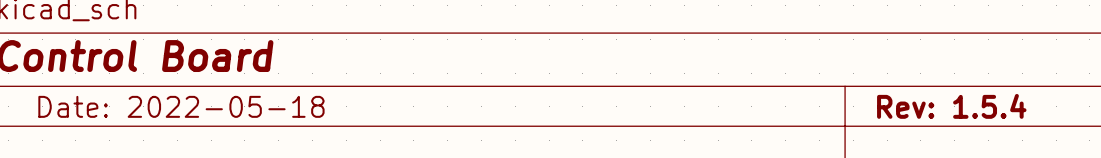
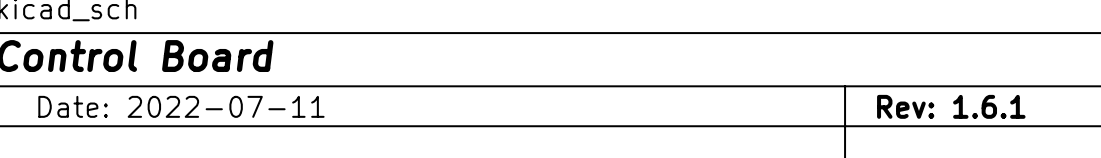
title block: Date: 2022-05-18 (181, 106) -> Date: 2022-07-11 (181, 106)
title block: Rev: 1.5.4 (951, 106) -> Rev: 1.6.1 (951, 106)

